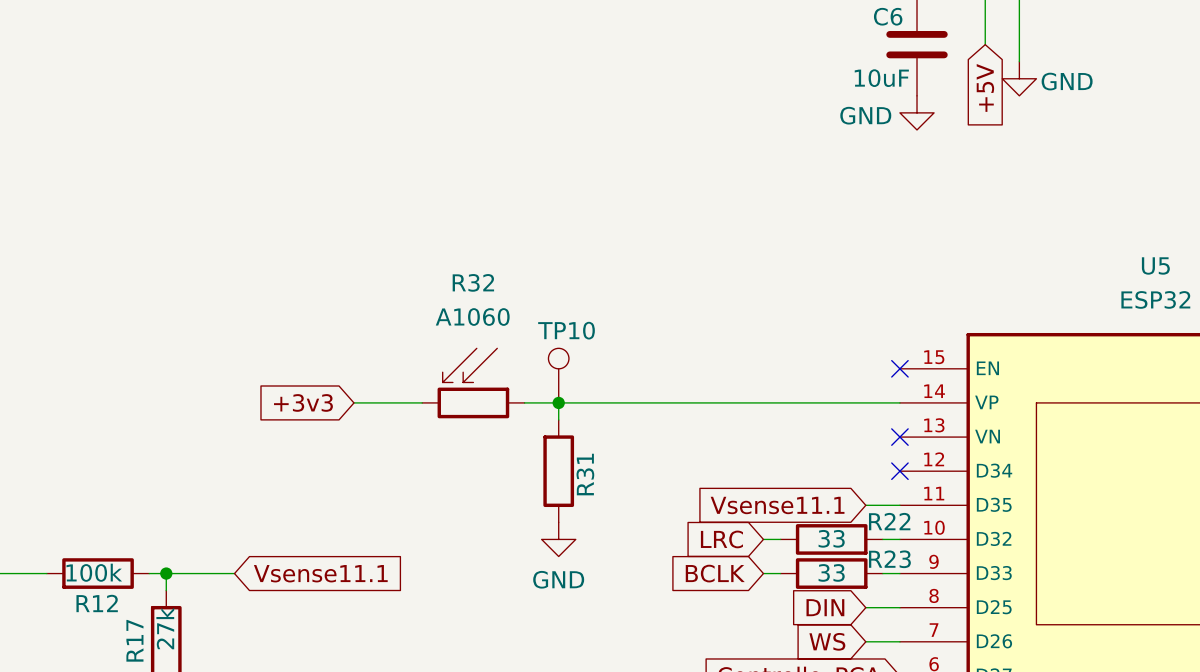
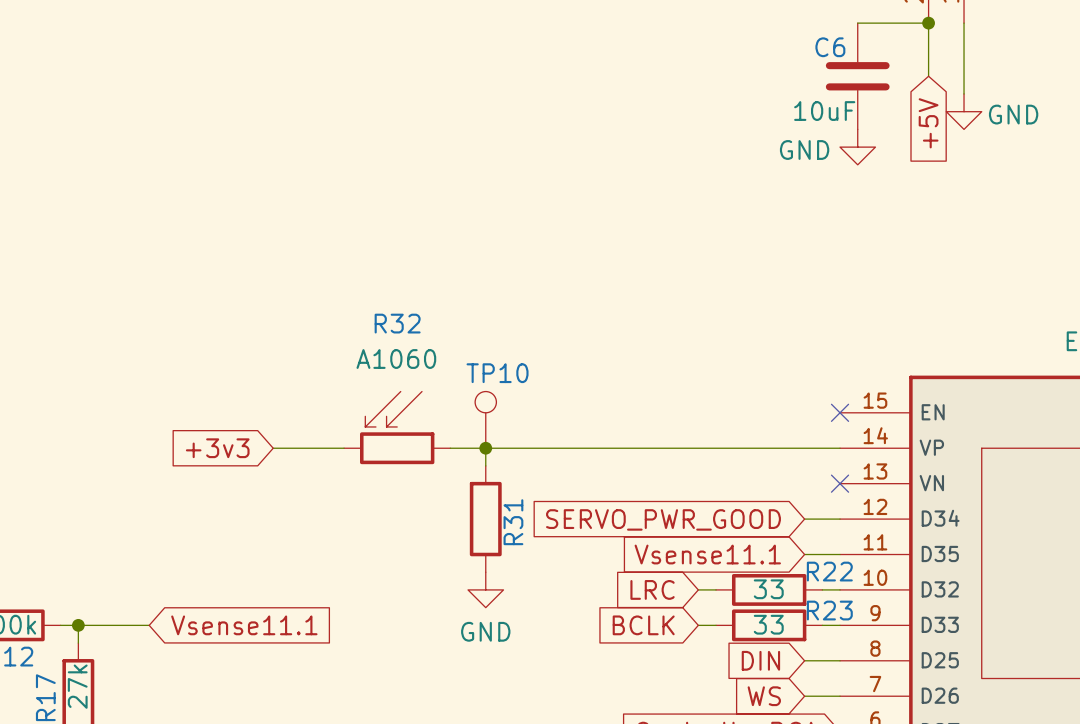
wire: none -> (804, 519) (840, 519)
no-connect mark: (899, 471) -> none
global label: none -> SERVO_PWR_GOOD (663, 519)

